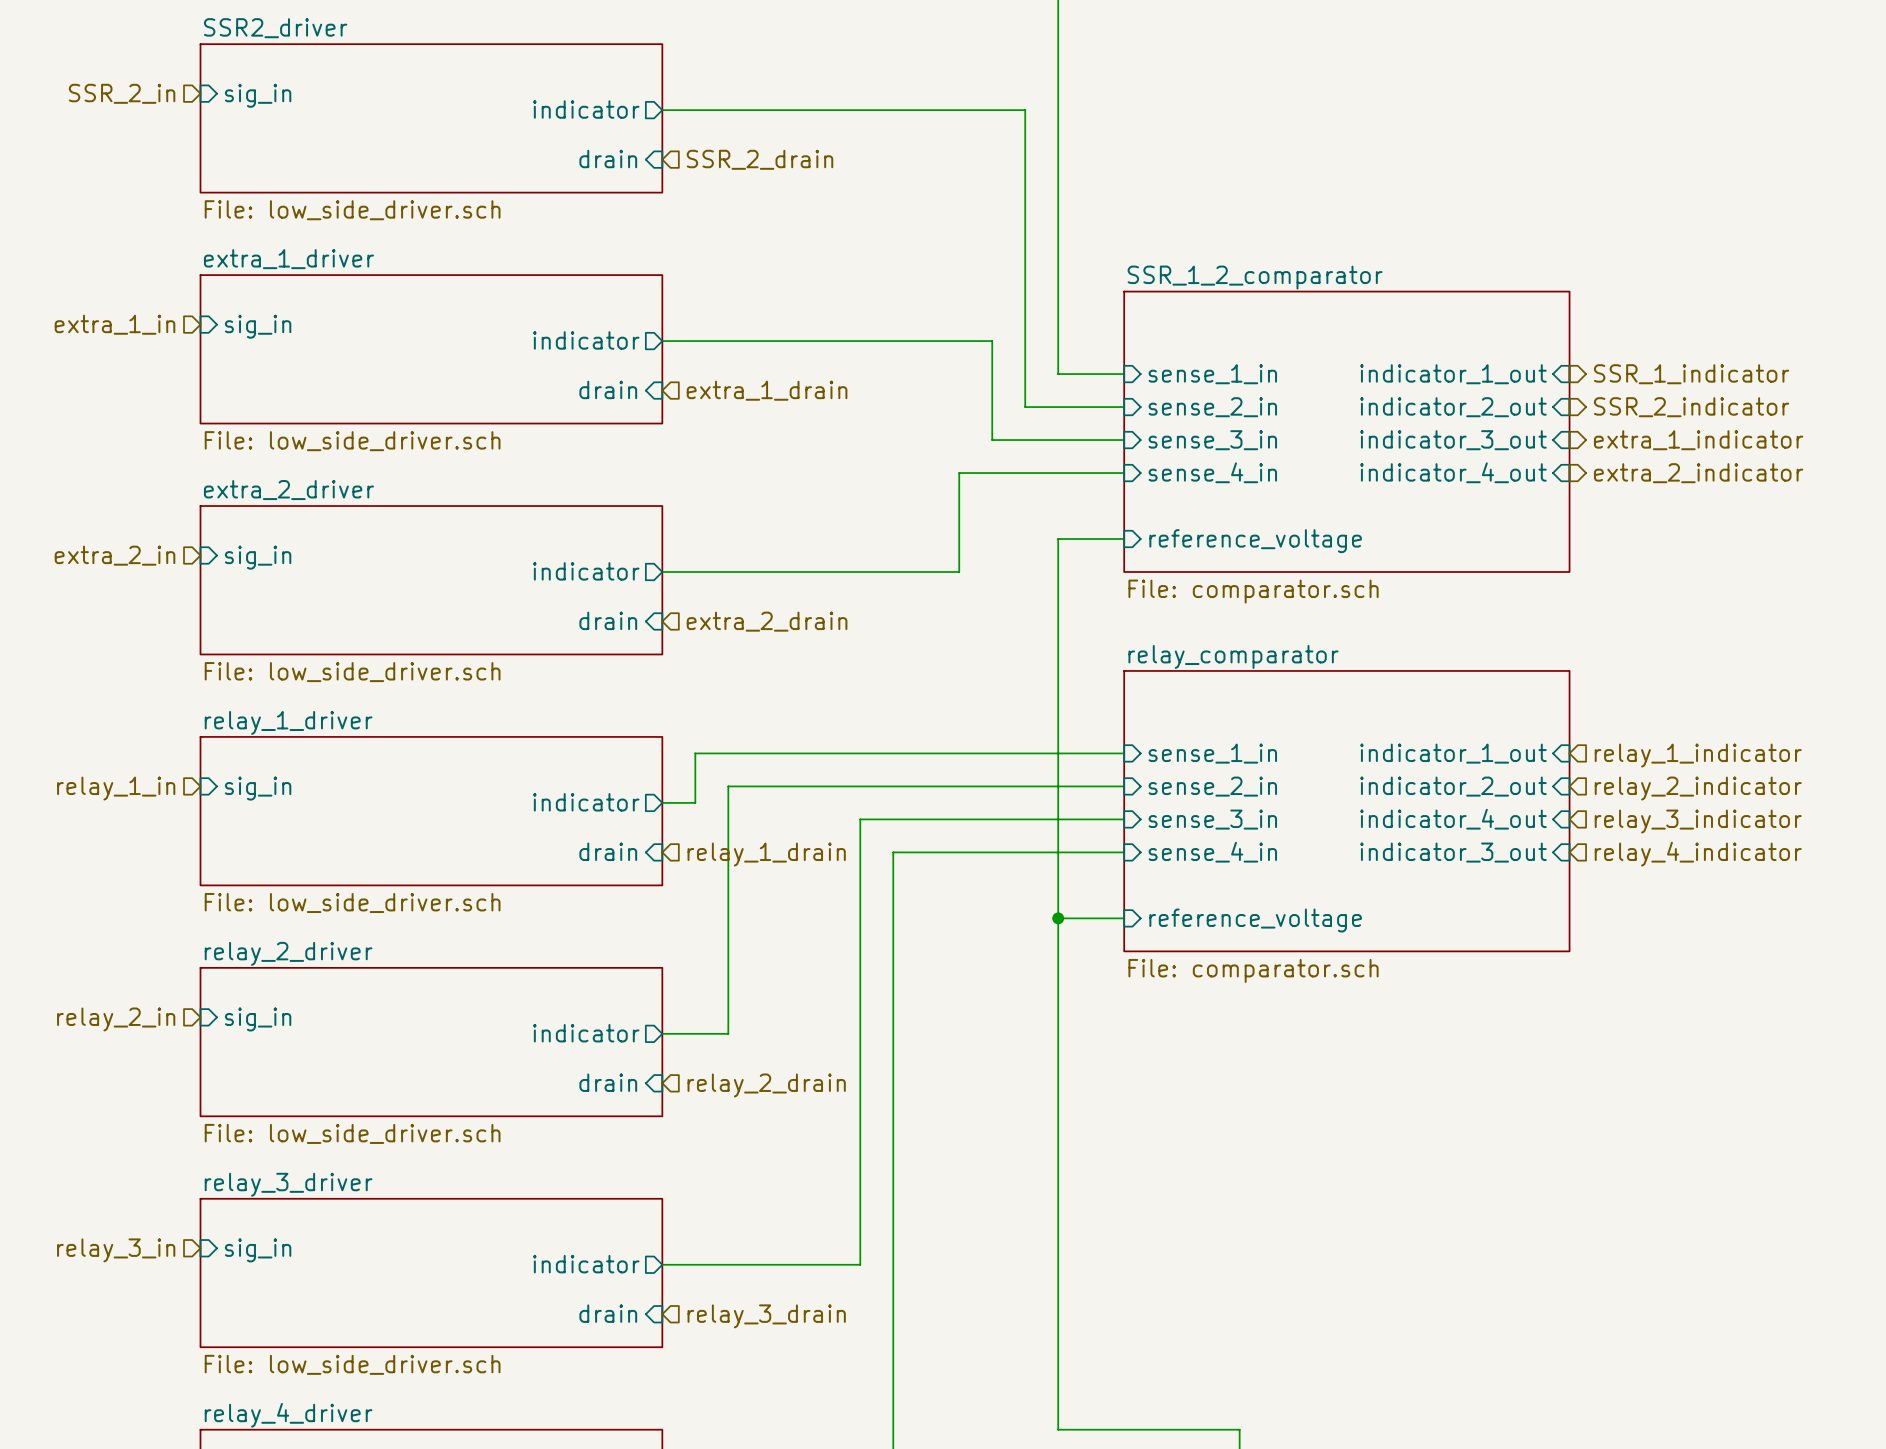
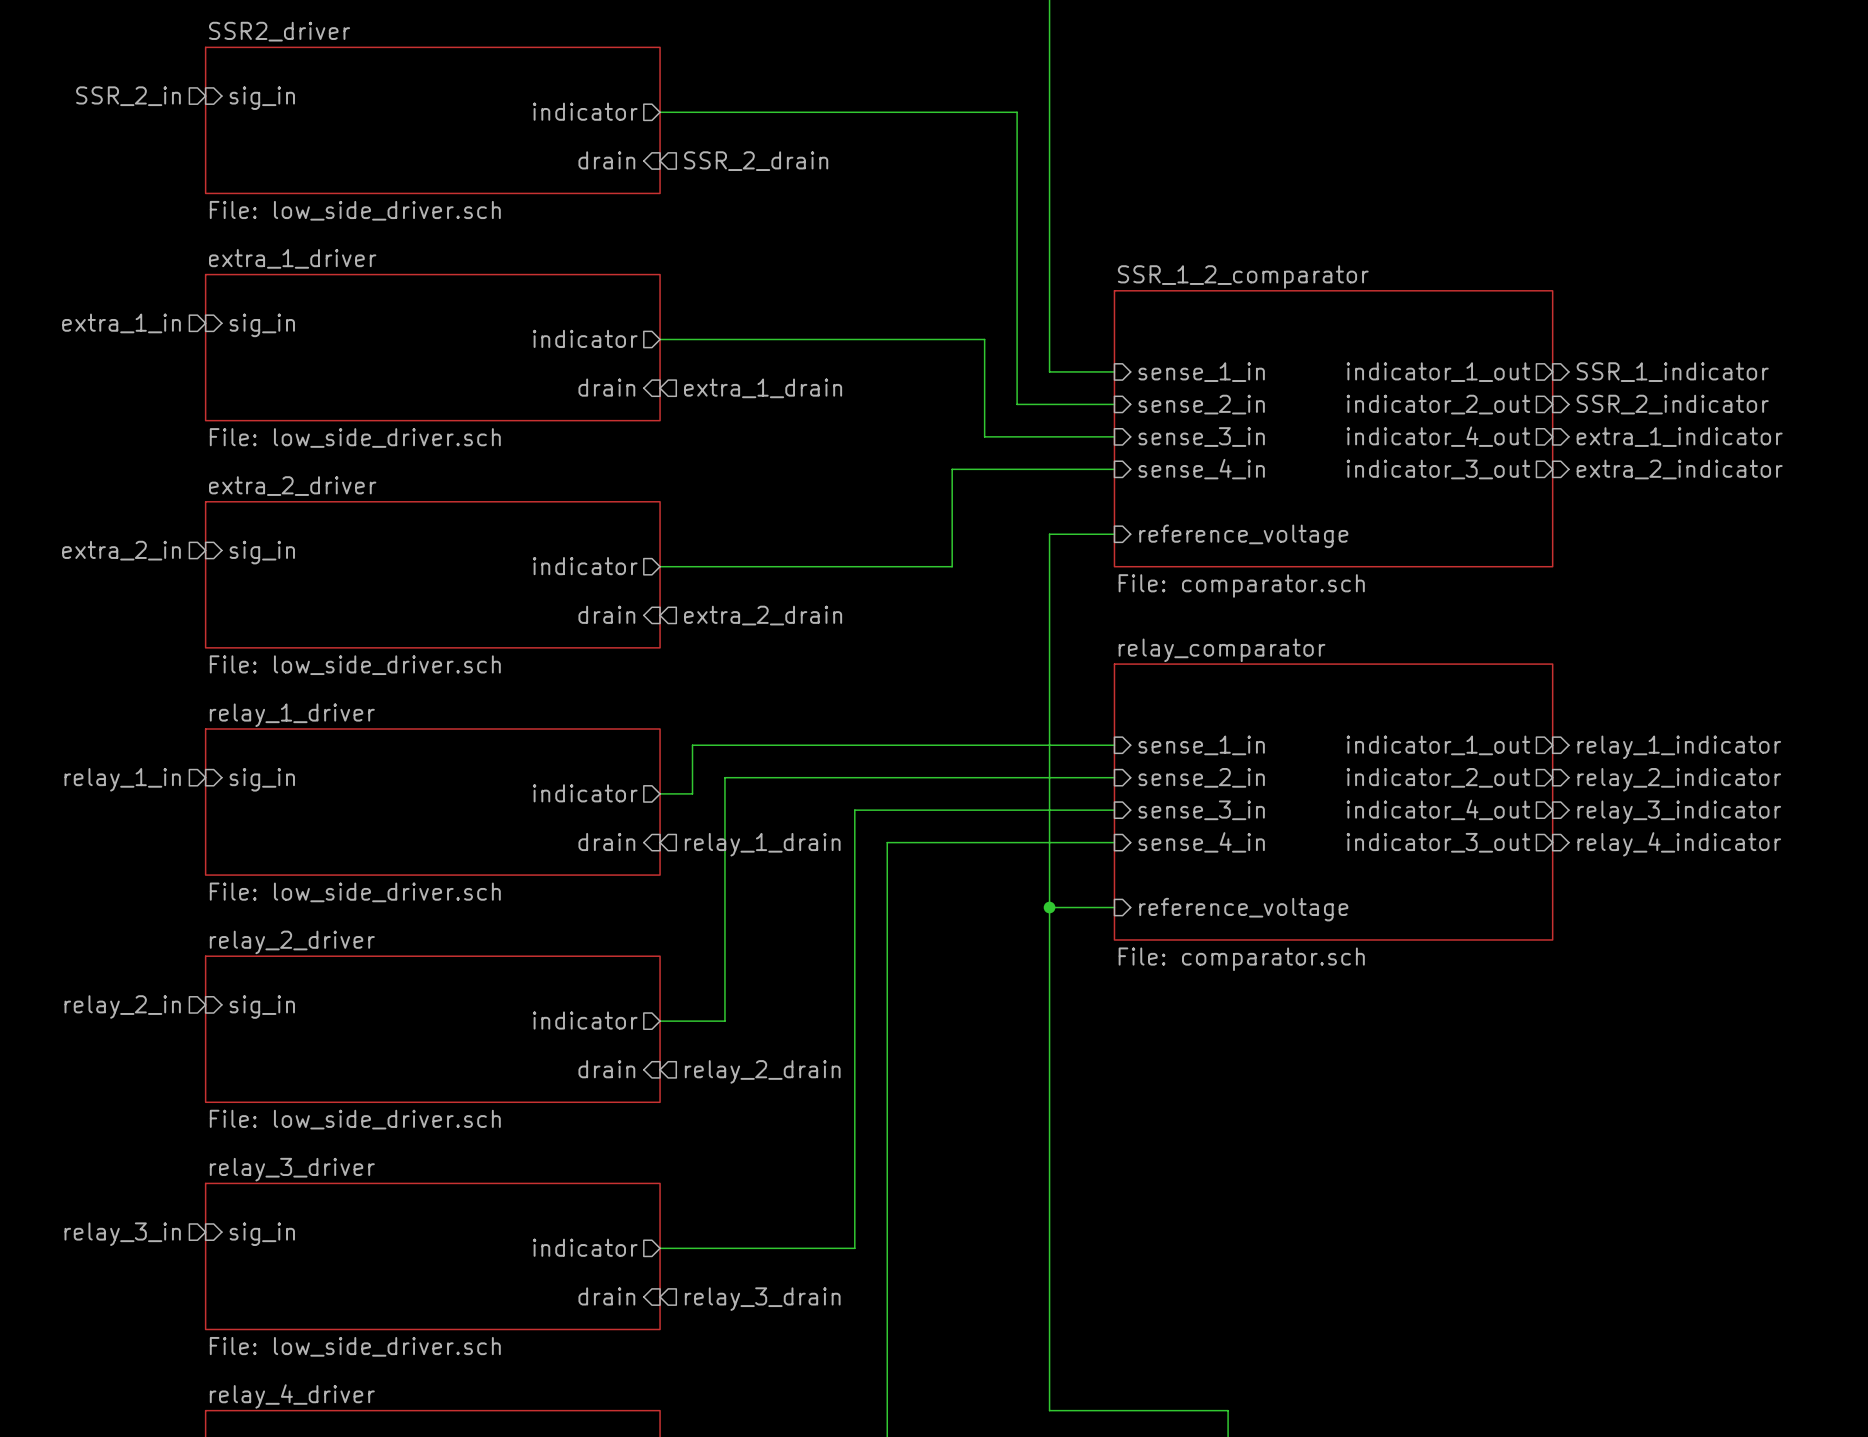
sheet pin shape: input (1453, 374) -> output (1438, 372)
sheet pin shape: input (1453, 407) -> output (1438, 404)
sheet pin shape: input (1453, 440) -> output (1438, 436)
sheet pin: indicator_3_out (1453, 440) -> indicator_4_out (1438, 436)
sheet pin shape: input (1453, 472) -> output (1438, 469)
sheet pin: indicator_4_out (1453, 472) -> indicator_3_out (1438, 469)
sheet pin shape: input (1453, 753) -> output (1438, 745)
hierarchical label shape: input (1698, 755) -> output (1679, 747)
sheet pin shape: input (1453, 786) -> output (1438, 777)
hierarchical label shape: input (1698, 788) -> output (1679, 779)
sheet pin shape: input (1453, 819) -> output (1438, 809)
hierarchical label shape: input (1698, 821) -> output (1679, 812)
sheet pin shape: input (1453, 852) -> output (1438, 842)
hierarchical label shape: input (1698, 854) -> output (1679, 844)

